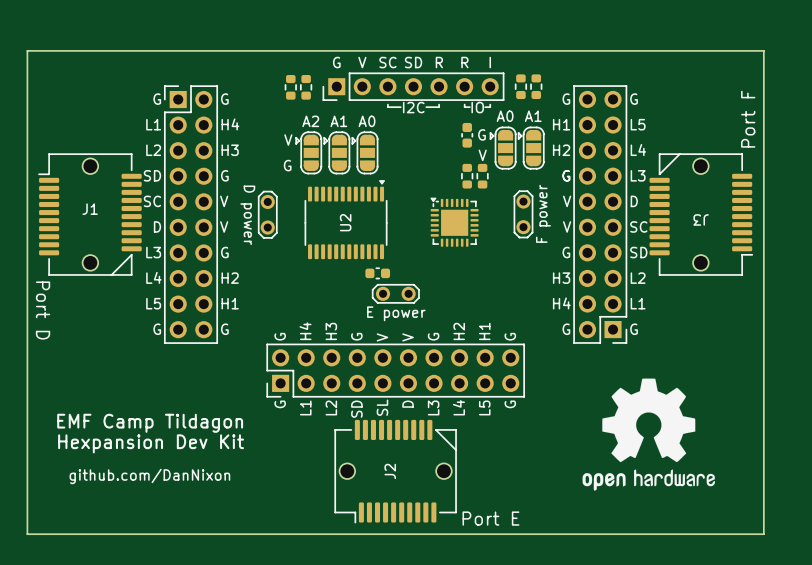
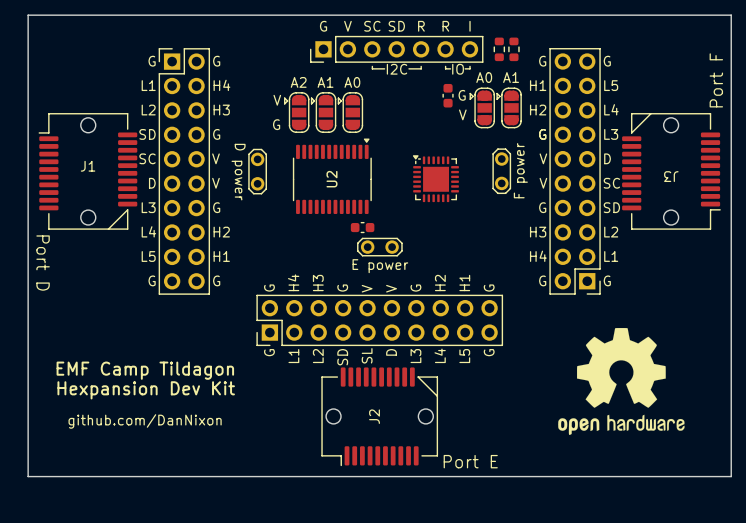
part: (290, 87) -> none
part: (306, 87) -> none
part: (467, 176) -> none
part: (482, 176) -> none

